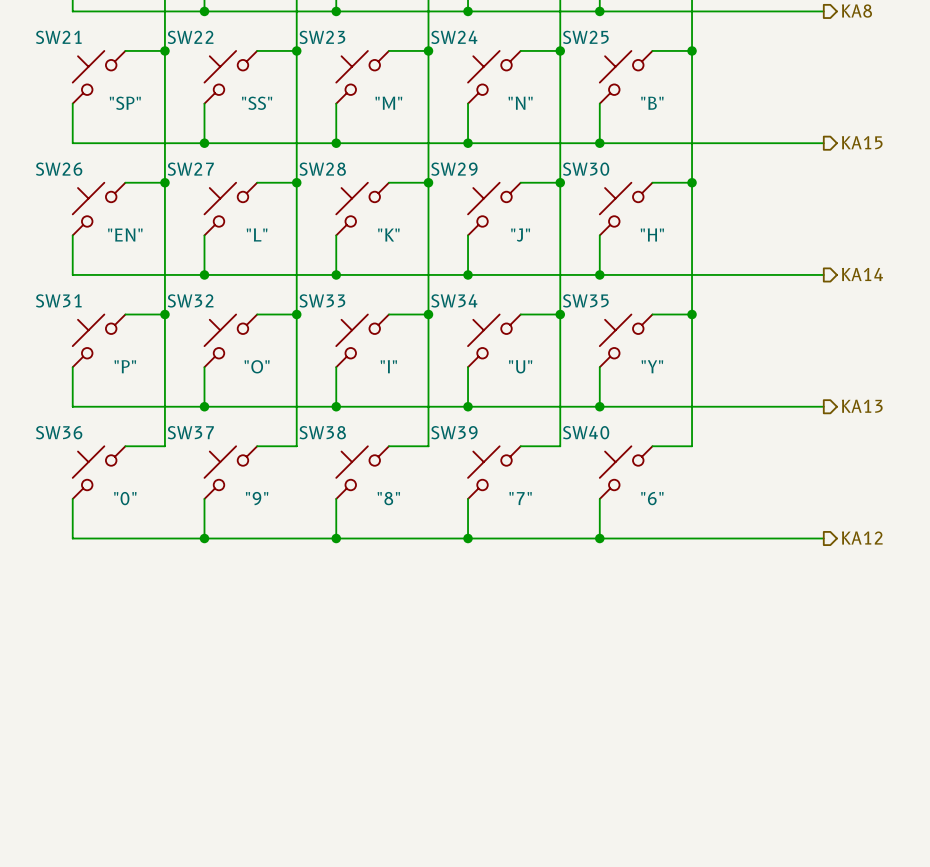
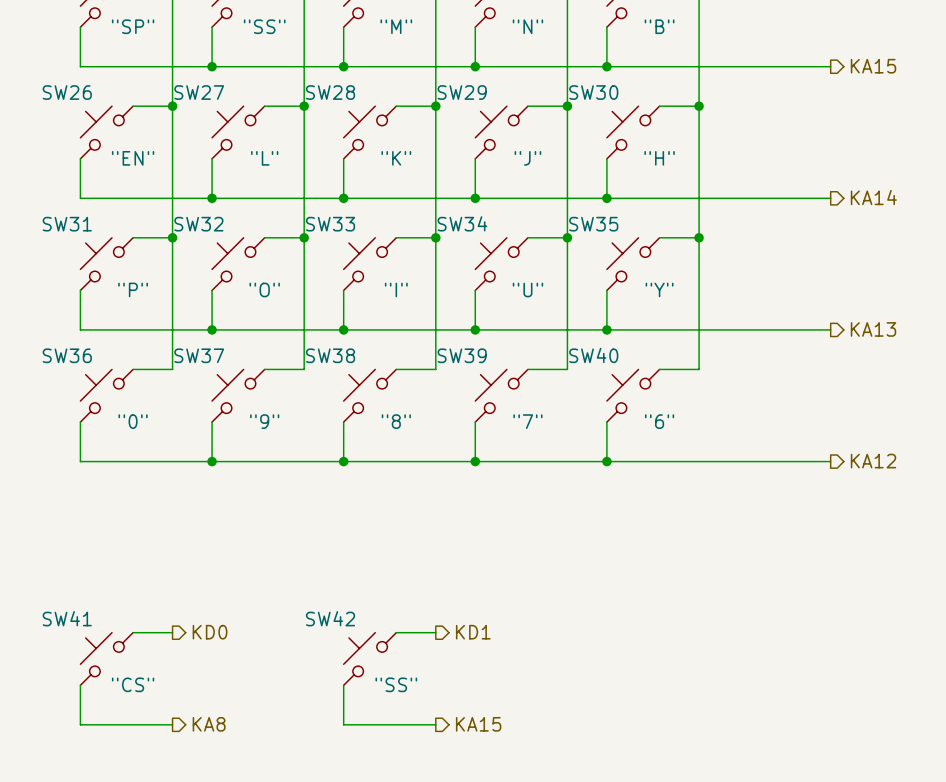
wire: none -> (133, 632) (172, 632)
hierarchical label: none -> KD0 (210, 632)
wire: none -> (396, 632) (435, 632)
hierarchical label: none -> KD1 (473, 632)
SW41: none -> "CS" (106, 659)
SW42: none -> "SS" (369, 659)
wire: none -> (80, 685) (80, 724) (172, 724)
wire: none -> (343, 685) (343, 724) (435, 724)
hierarchical label: none -> KA8 (209, 724)
hierarchical label: none -> KA15 (478, 724)

